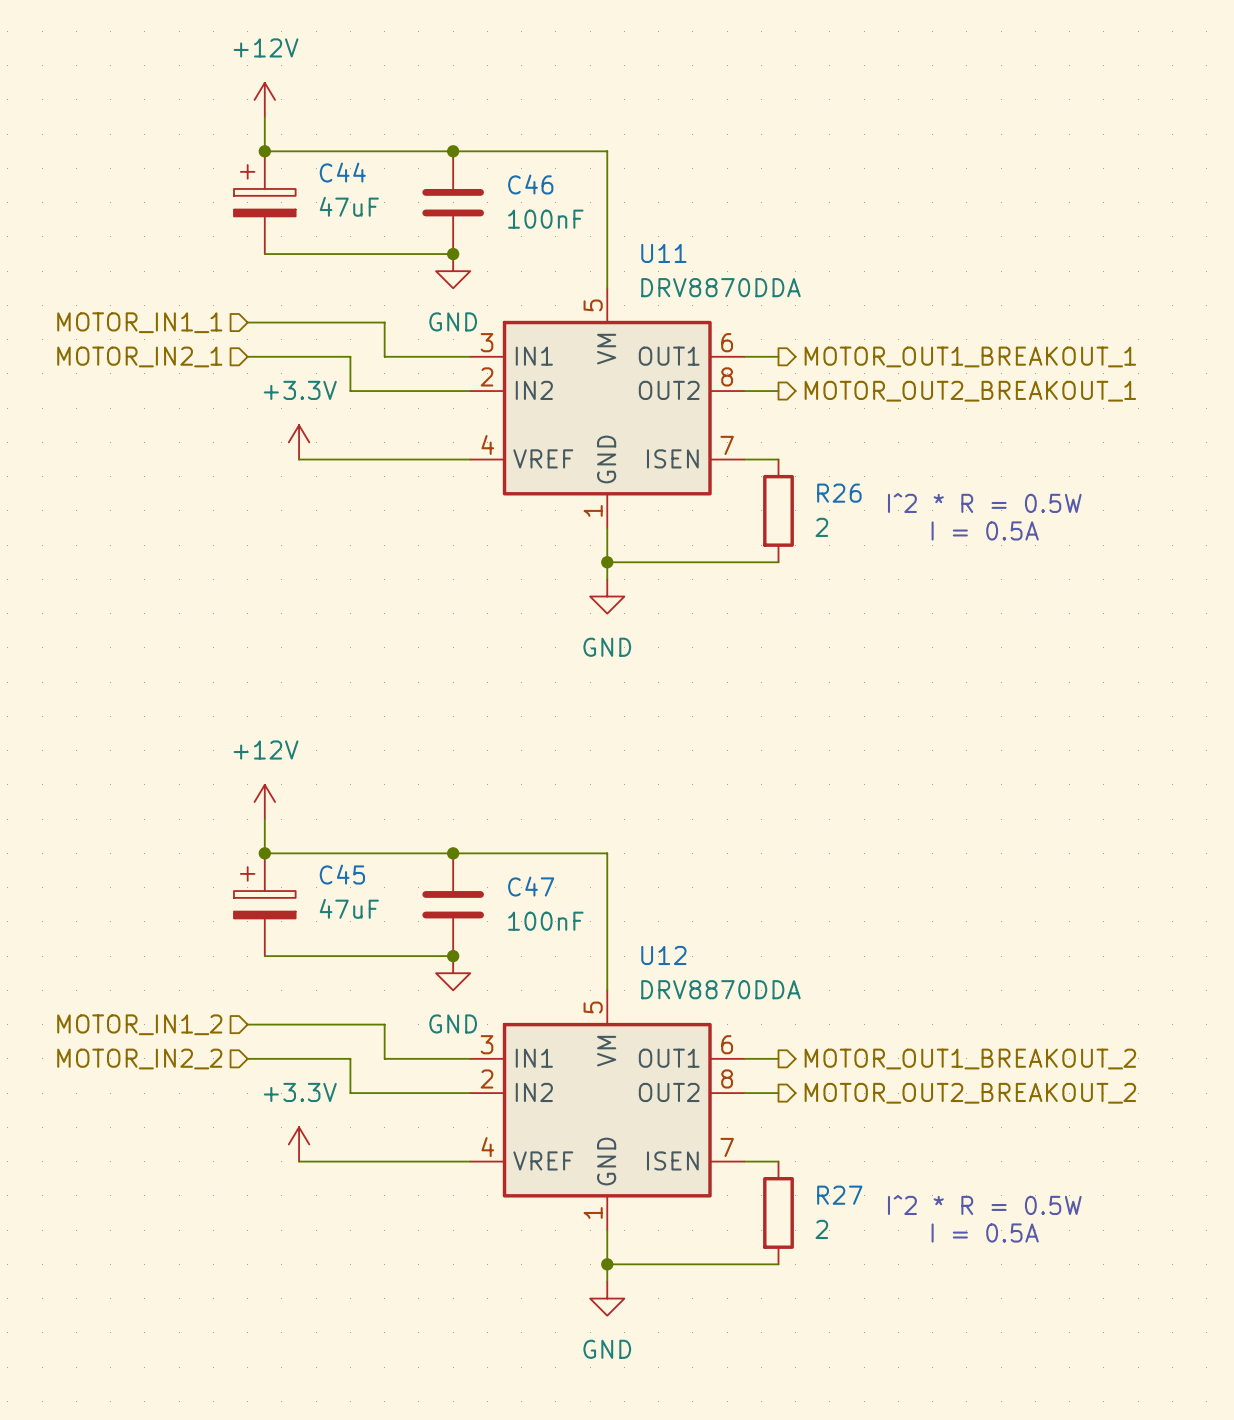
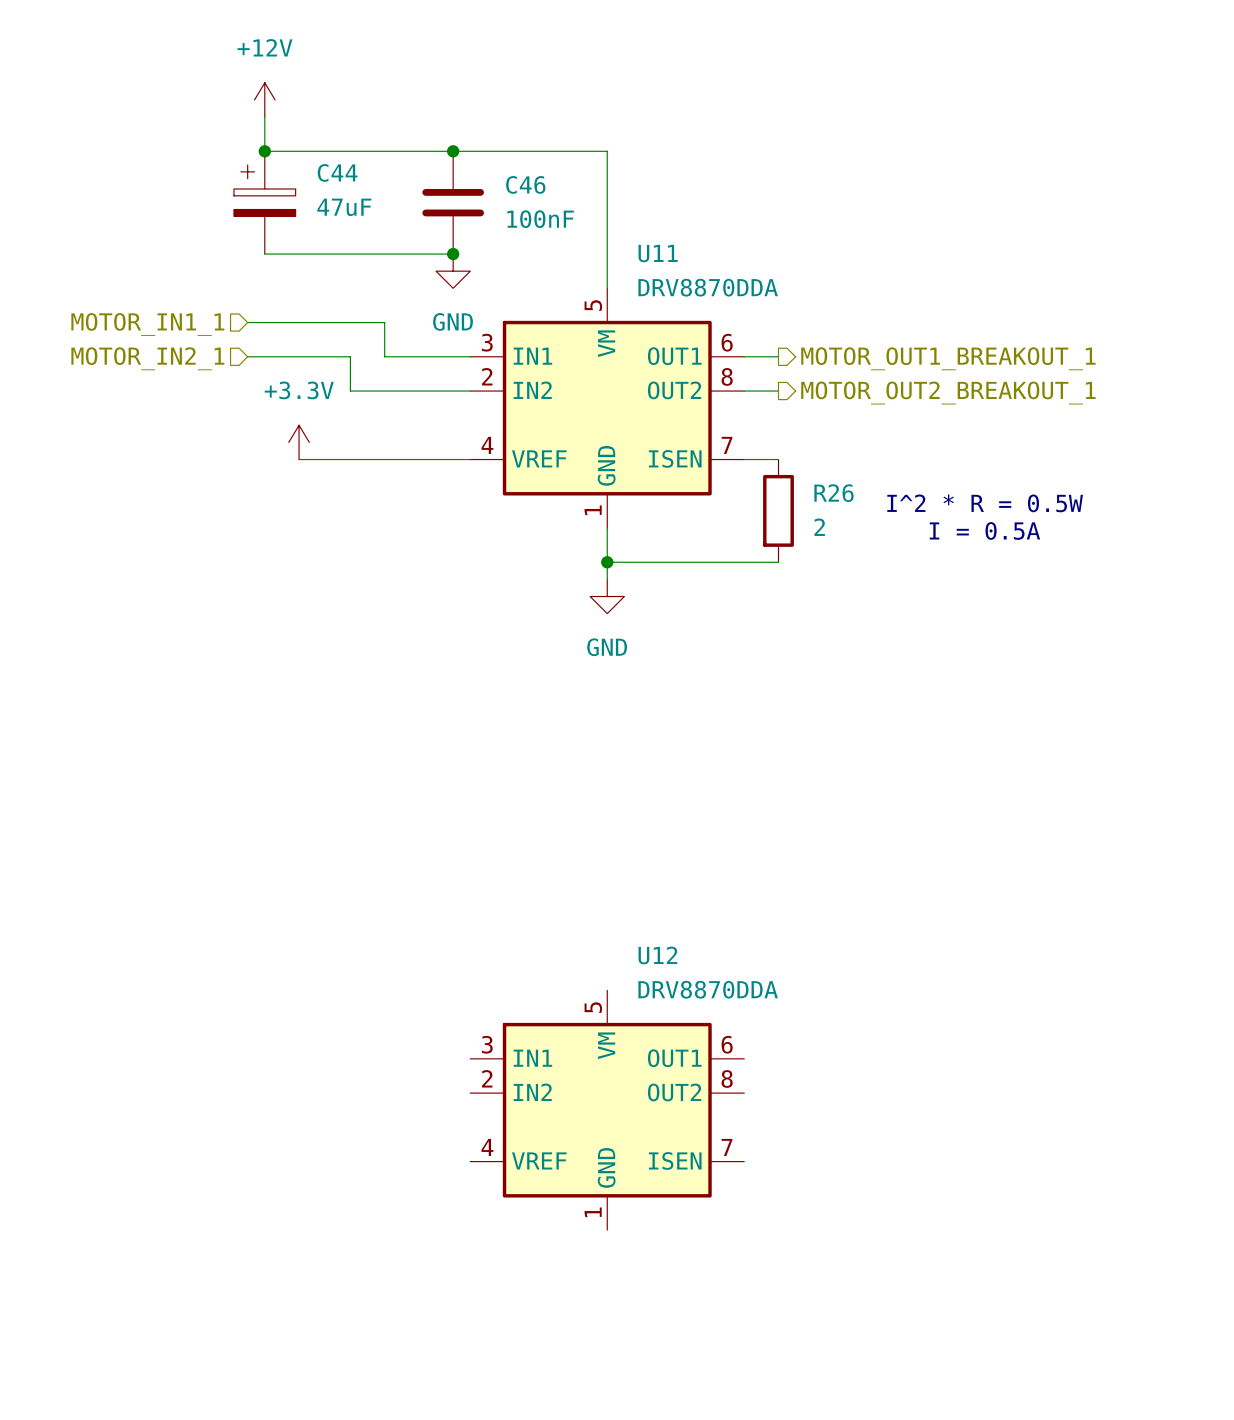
power symbol: +12V (264, 802) -> none
wire: (264, 819) (264, 853) (607, 853) (607, 990) -> none
junction: (264, 853) -> none
junction: (453, 853) -> none
C45: 47uF (264, 904) -> none
C47: 100nF (453, 904) -> none
wire: (264, 956) (453, 956) -> none
junction: (453, 956) -> none
power symbol: GND (453, 973) -> none
hierarchical label: MOTOR_IN1_2 (139, 1024) -> none
wire: (247, 1024) (384, 1024) (384, 1058) (470, 1058) -> none
wire: (247, 1058) (350, 1058) (350, 1093) (470, 1093) -> none
wire: (744, 1058) (778, 1058) -> none
hierarchical label: MOTOR_IN2_2 (139, 1059) -> none
hierarchical label: MOTOR_OUT1_BREAKOUT_2 (970, 1059) -> none
wire: (744, 1093) (778, 1093) -> none
hierarchical label: MOTOR_OUT2_BREAKOUT_2 (970, 1093) -> none
power symbol: +3.3V (299, 1144) -> none
wire: (299, 1161) (470, 1161) -> none
wire: (744, 1161) (778, 1161) -> none
text: I^2 * R = 0.5W (984, 1205) -> none
R27: 2 (778, 1212) -> none
wire: (607, 1230) (607, 1281) -> none
text: I = 0.5A (985, 1233) -> none
wire: (607, 1264) (778, 1264) -> none
junction: (607, 1264) -> none
power symbol: GND (607, 1298) -> none

